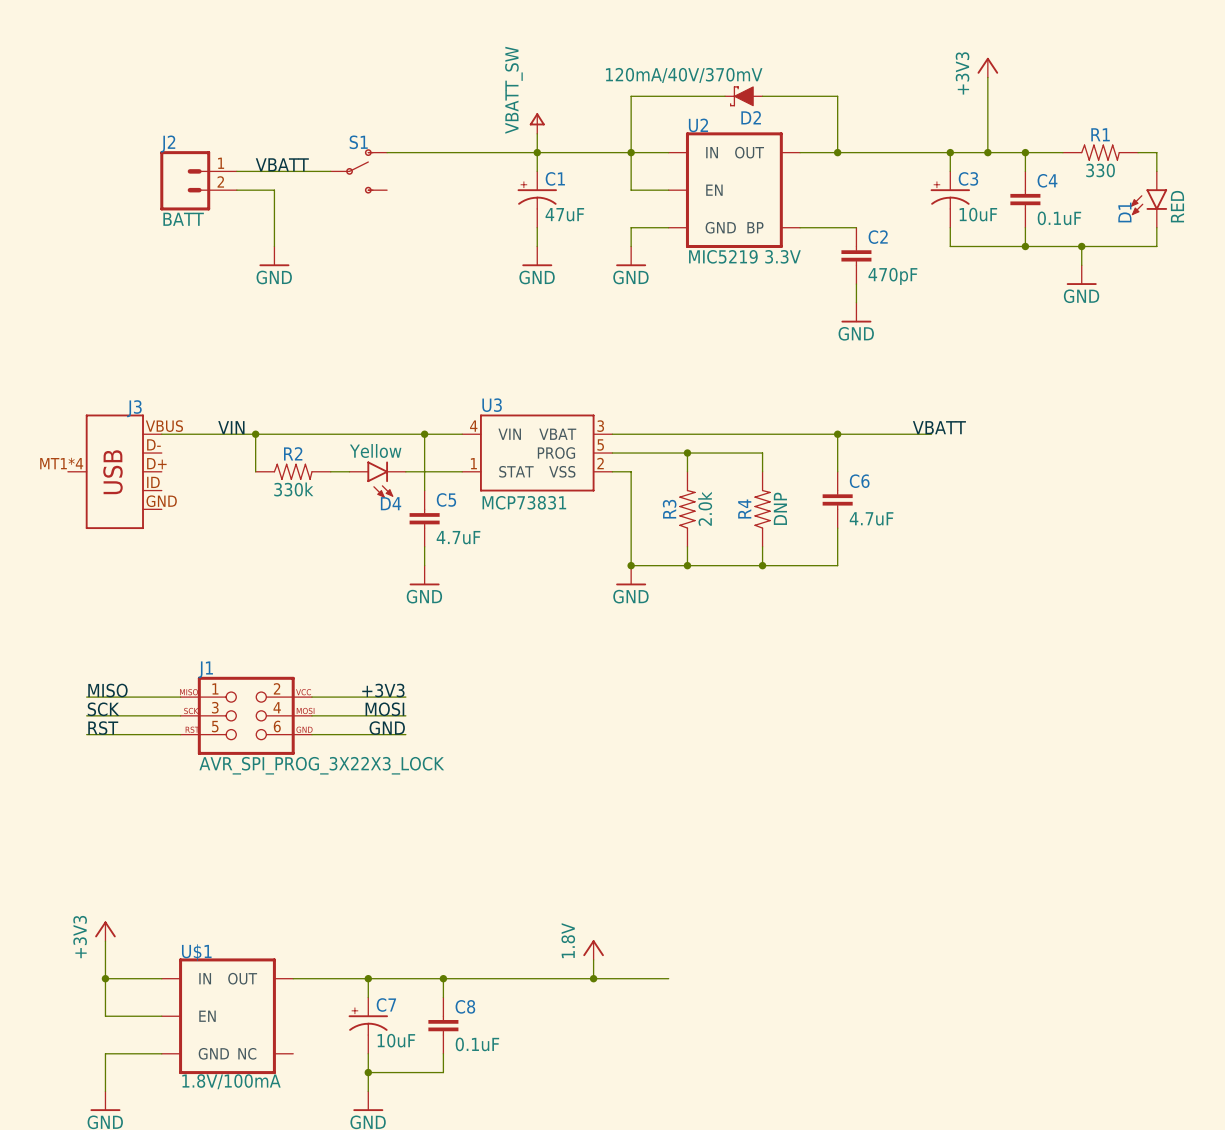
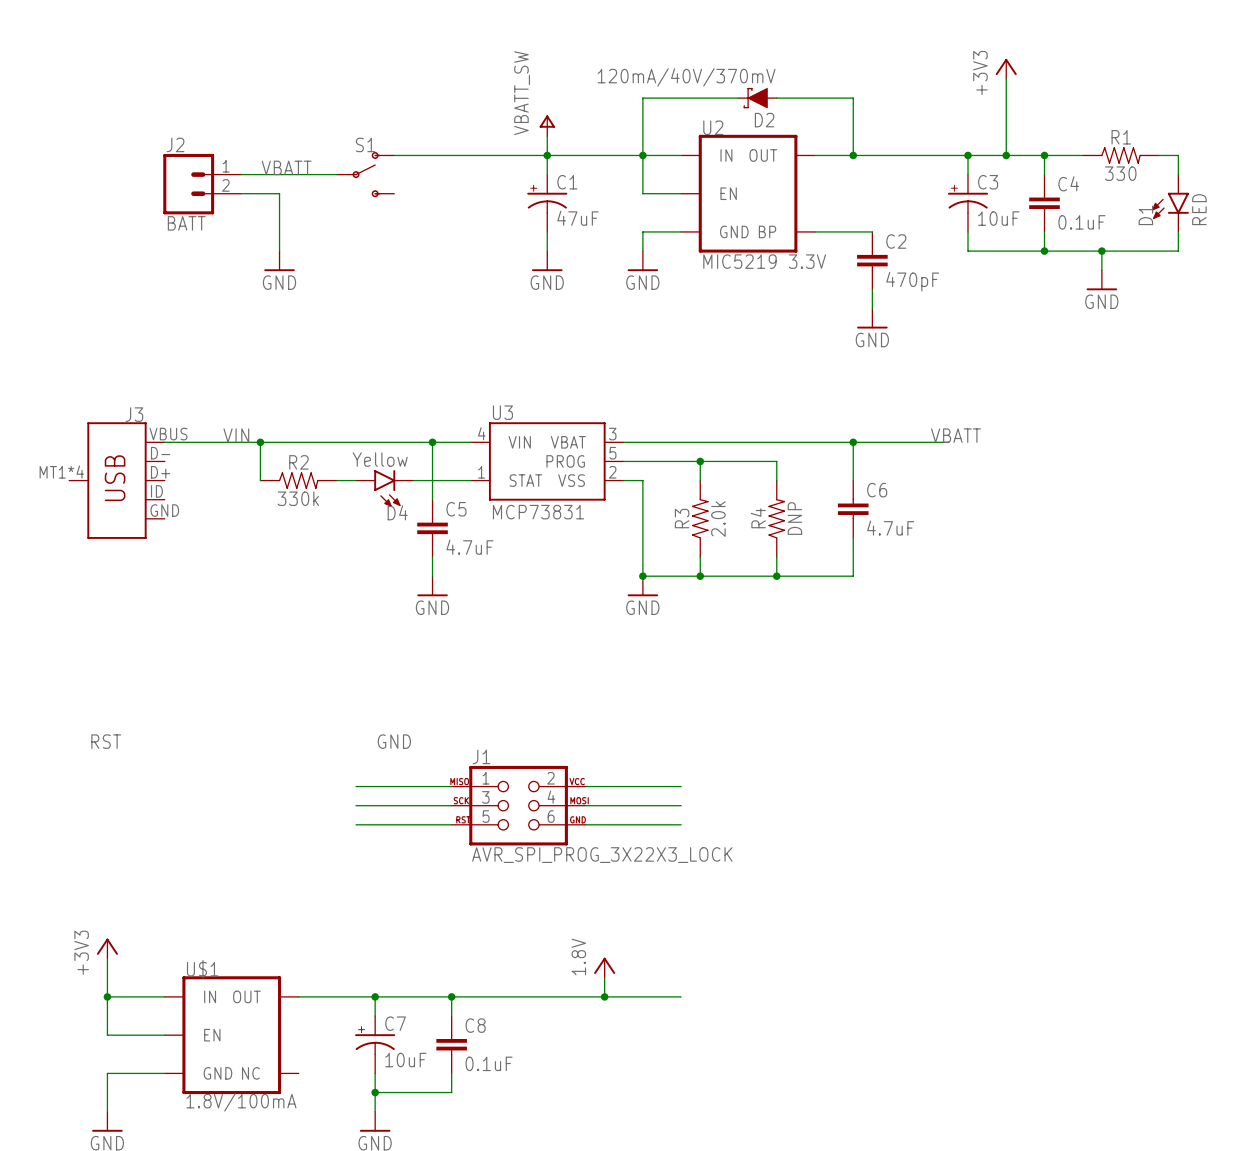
label: MISO (107, 690) -> none
label: +3V3 (383, 690) -> none
wire: (86, 697) (180, 697) -> none
wire: (311, 697) (405, 697) -> (356, 786) (451, 786)
label: SCK (103, 709) -> none
label: MOSI (384, 709) -> none
wire: (86, 715) (180, 715) -> none
J1 position: (246, 715) -> (518, 805)
wire: (311, 715) (405, 715) -> (356, 805) (451, 805)
wire: (86, 734) (180, 734) -> none
wire: (311, 734) (405, 734) -> (356, 824) (451, 824)
wire: none -> (585, 786) (681, 786)
wire: none -> (585, 805) (681, 805)
wire: none -> (585, 824) (681, 824)

